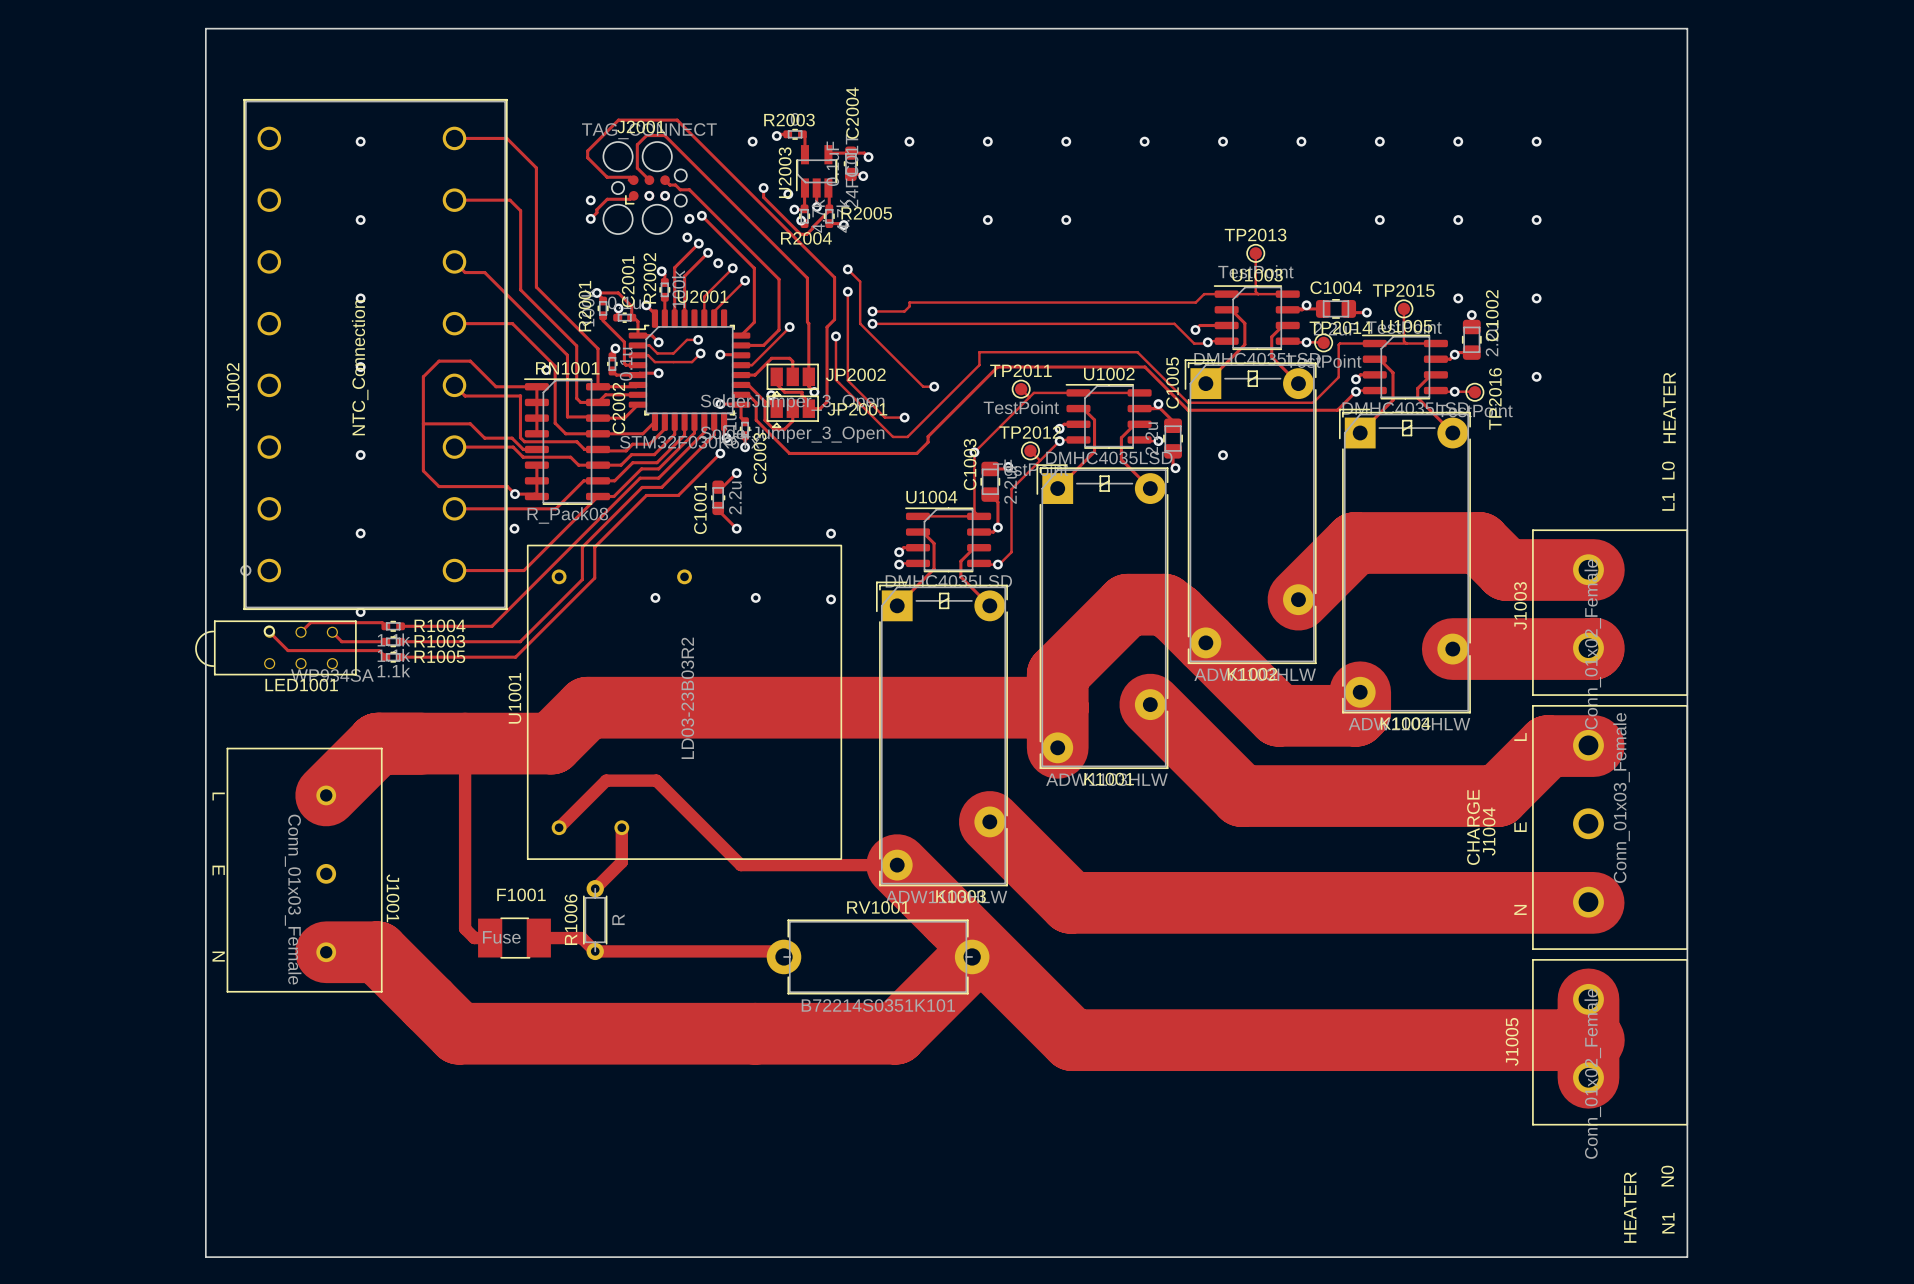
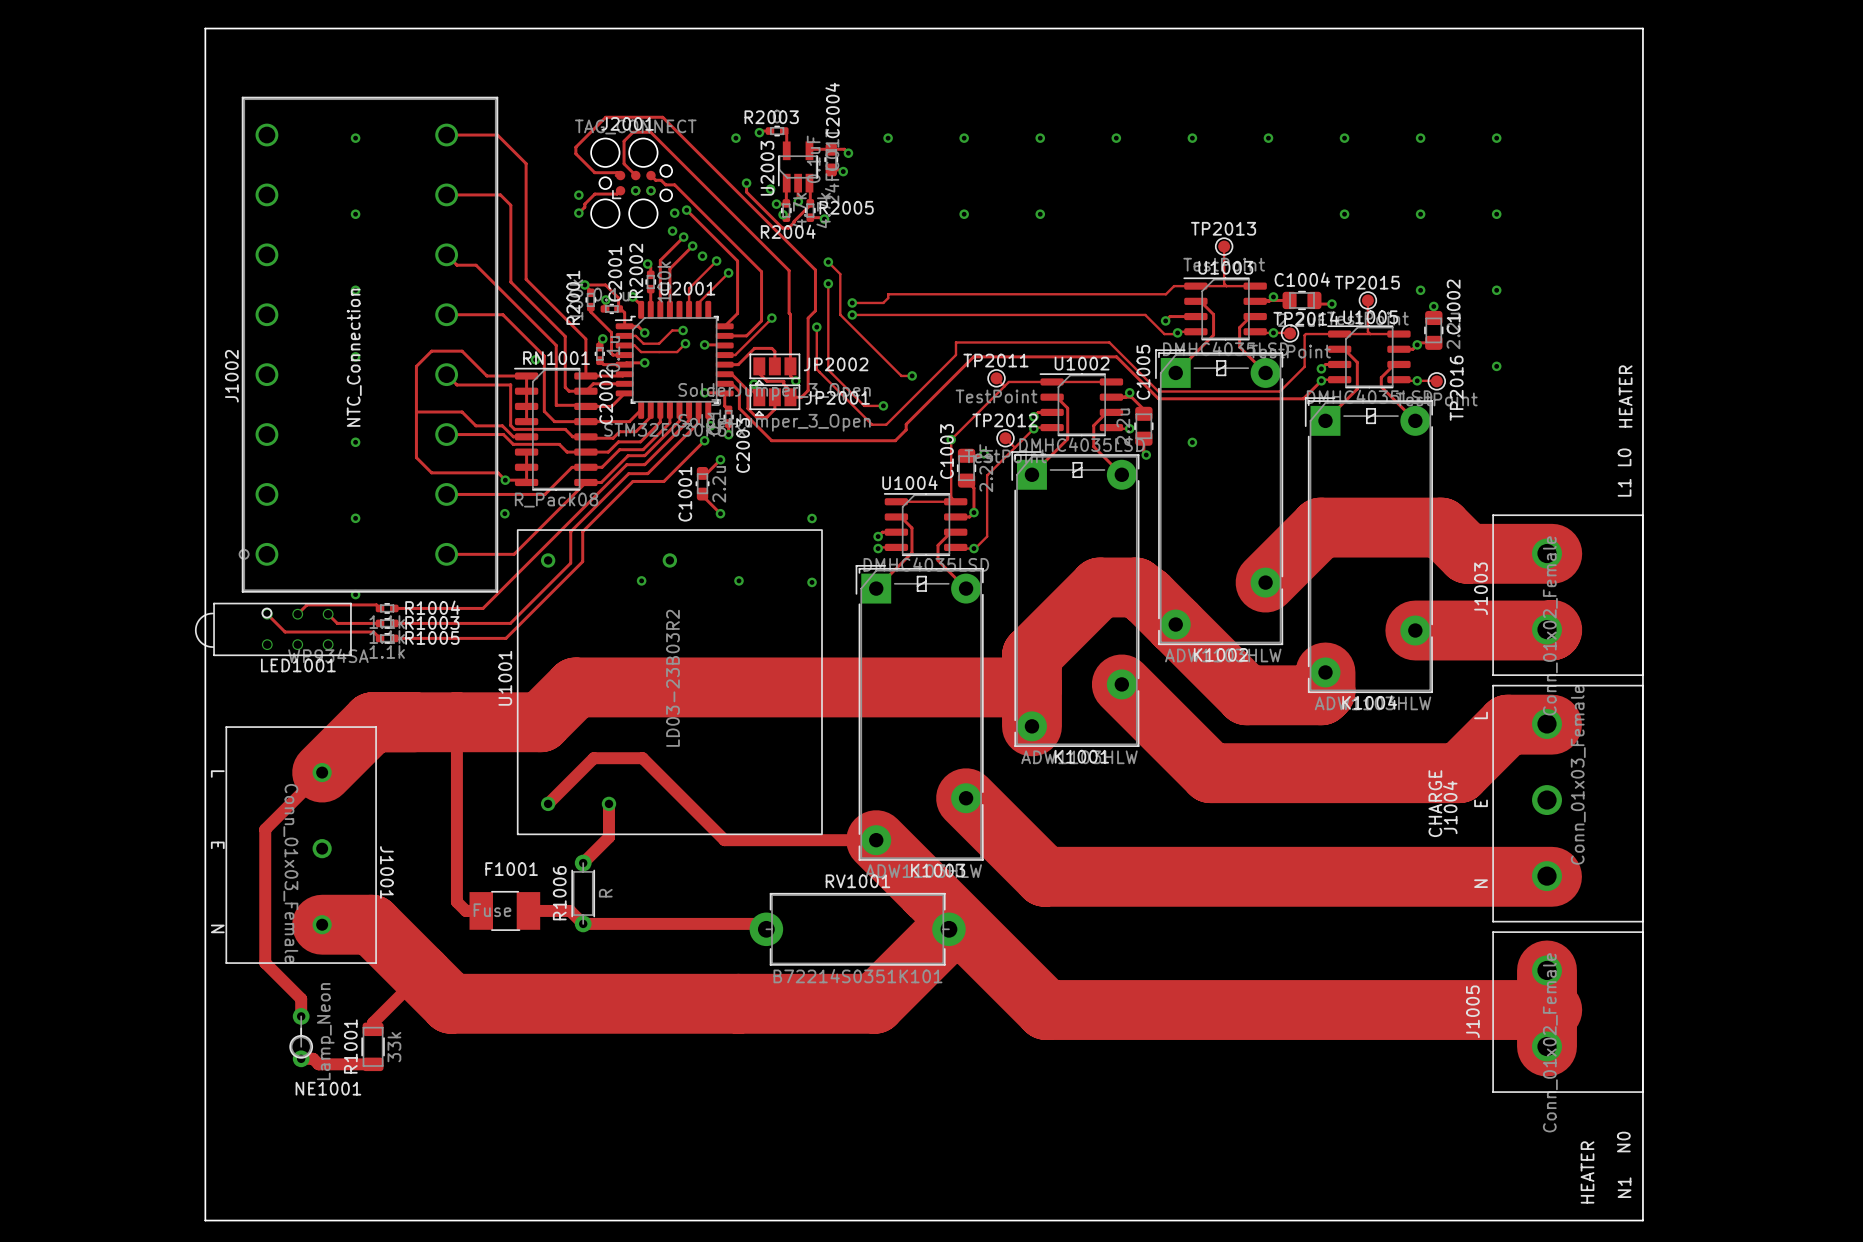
track: none -> (322, 772) (265, 829) (265, 962) (301, 998) (301, 1016)
track: none -> (421, 974) (373, 1022) (373, 1029)
NE1001: none -> Lamp_Neon (301, 1037)
R1001: none -> 33k (373, 1046)
track: none -> (301, 1058) (313, 1058) (318, 1064) (373, 1064)

